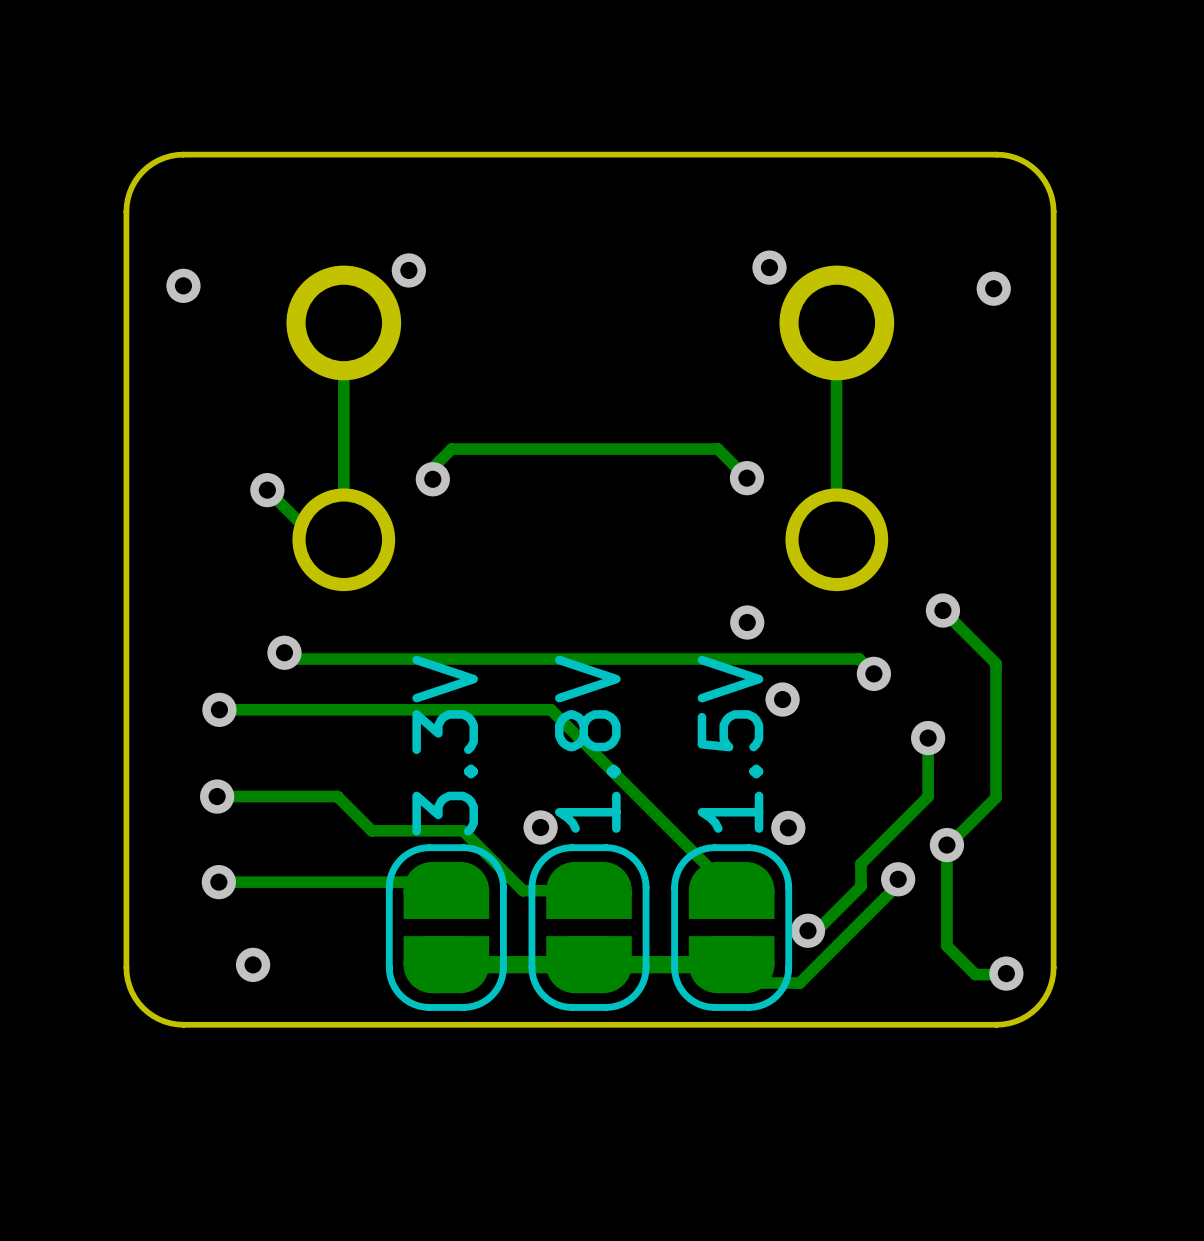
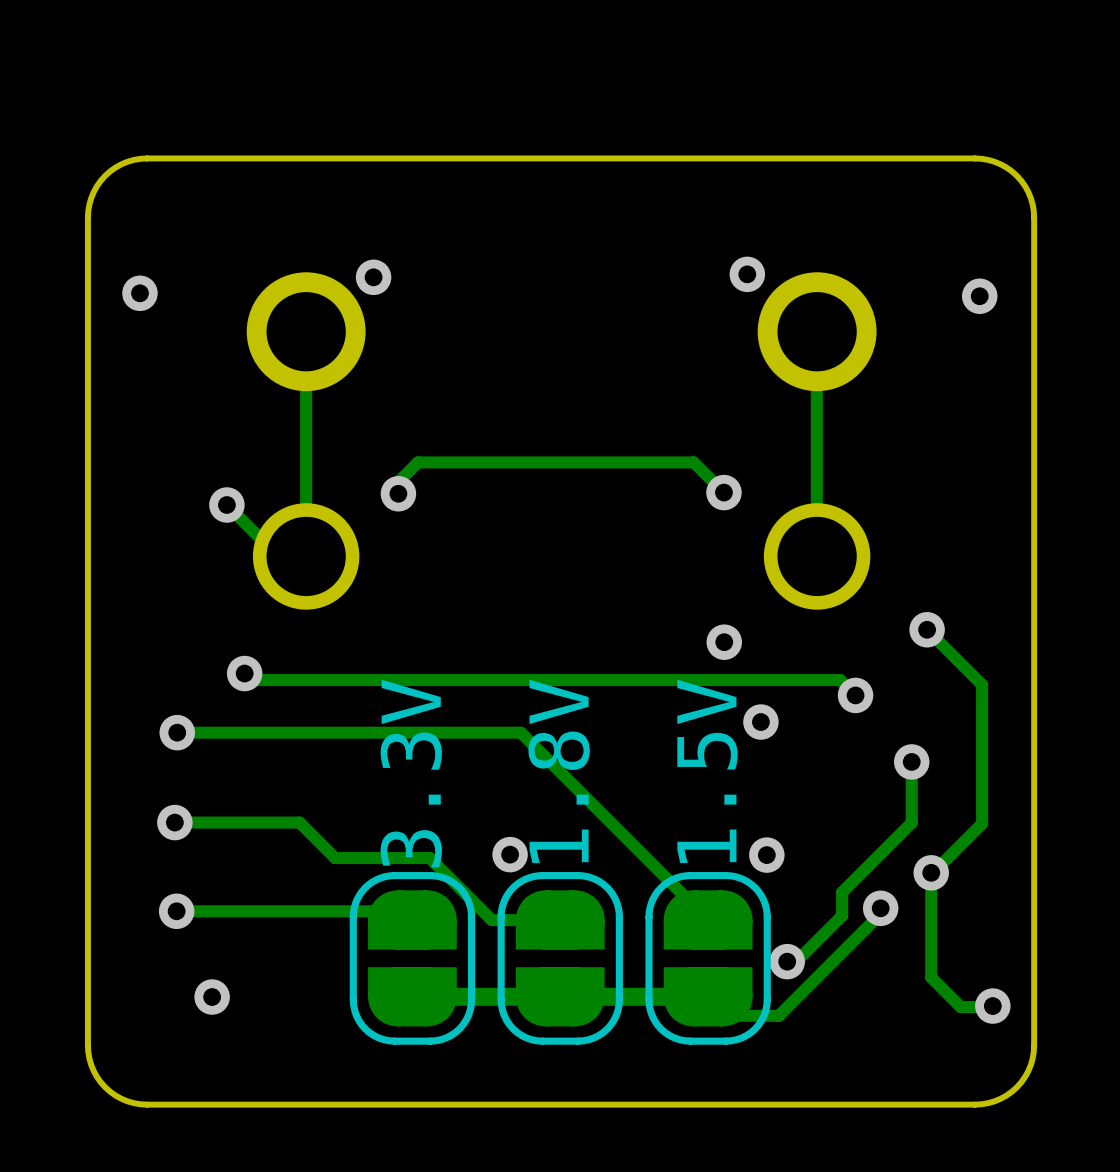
board edge: (996, 154) (183, 154) (164, 157) (143, 171) (132, 186) (126, 211) (126, 967) (132, 992) (143, 1008) (158, 1019) (183, 1024) (996, 1024) (1021, 1019) (1036, 1008) (1048, 992) (1053, 967) (1053, 211) (1048, 186) (1036, 171) (1021, 160) (996, 154) -> (975, 158) (1000, 164) (1016, 175) (1028, 191) (1034, 217) (1034, 1045) (1028, 1071) (1016, 1087) (1000, 1098) (975, 1104) (147, 1104) (121, 1098) (105, 1087) (93, 1071) (87, 1045) (87, 217) (93, 191) (105, 175) (127, 161) (147, 158) (975, 158)

